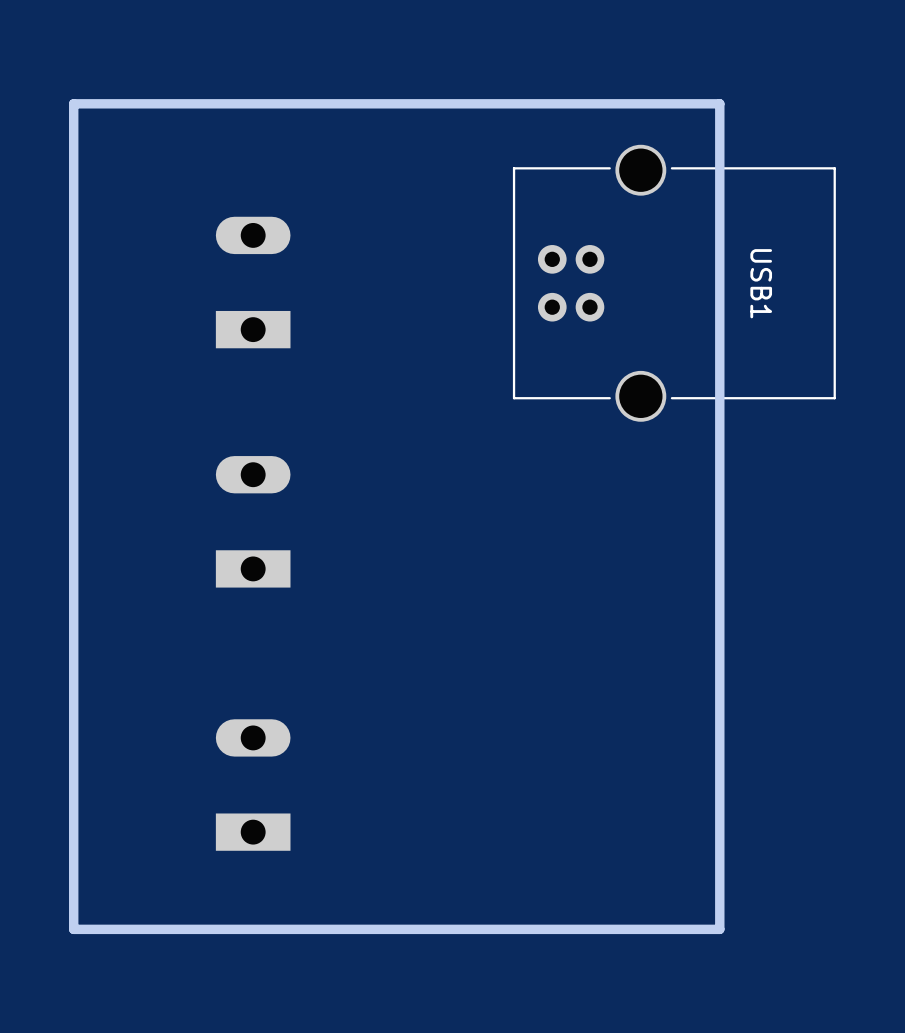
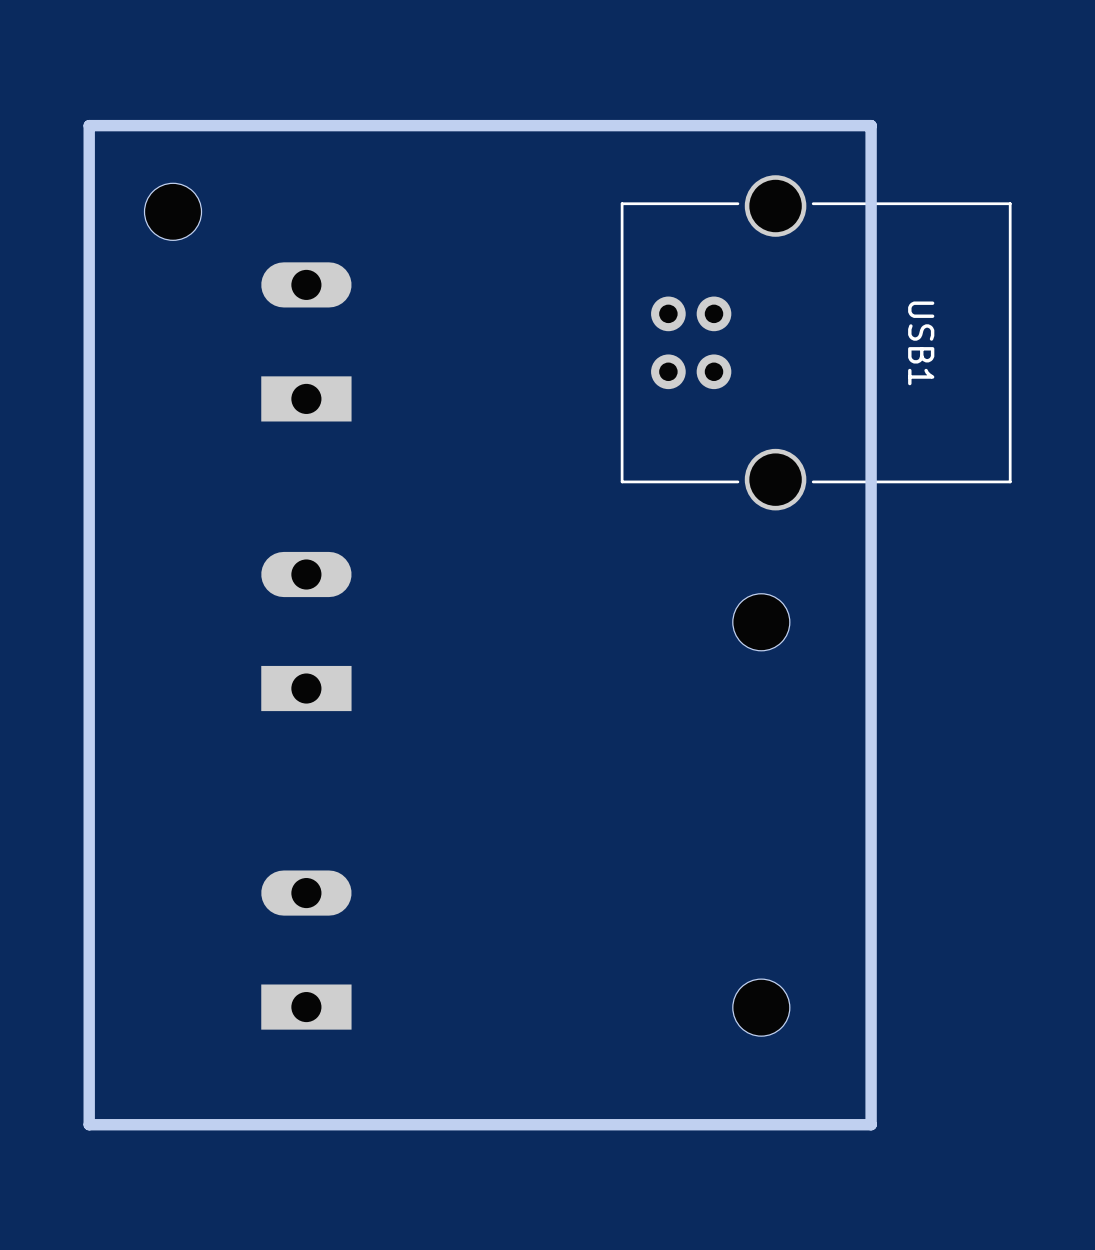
part: none -> (173, 211)
part: none -> (761, 622)
part: none -> (761, 1007)

